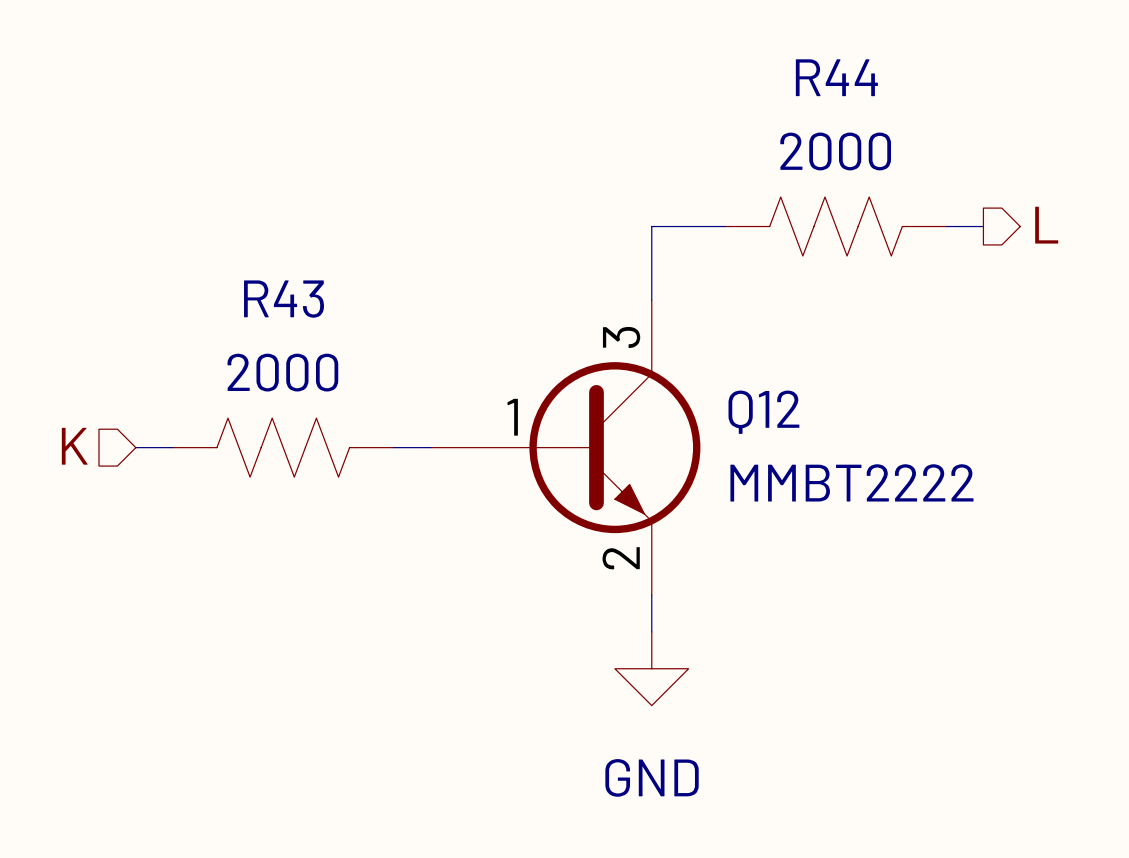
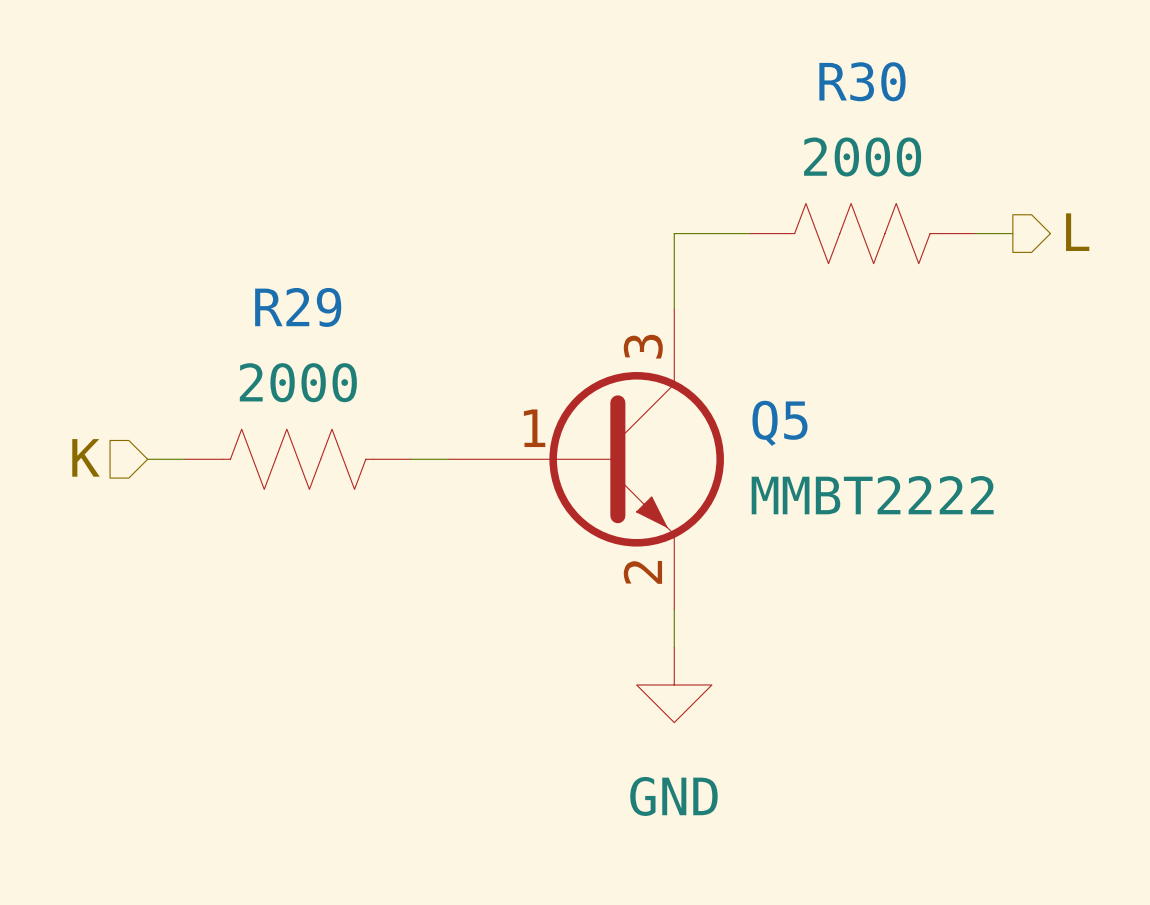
R44 name: R44 (836, 77) -> R30 (862, 81)
R43 name: R43 (284, 299) -> R29 (298, 307)
Q12 name: Q12 (763, 412) -> Q5 (779, 423)

